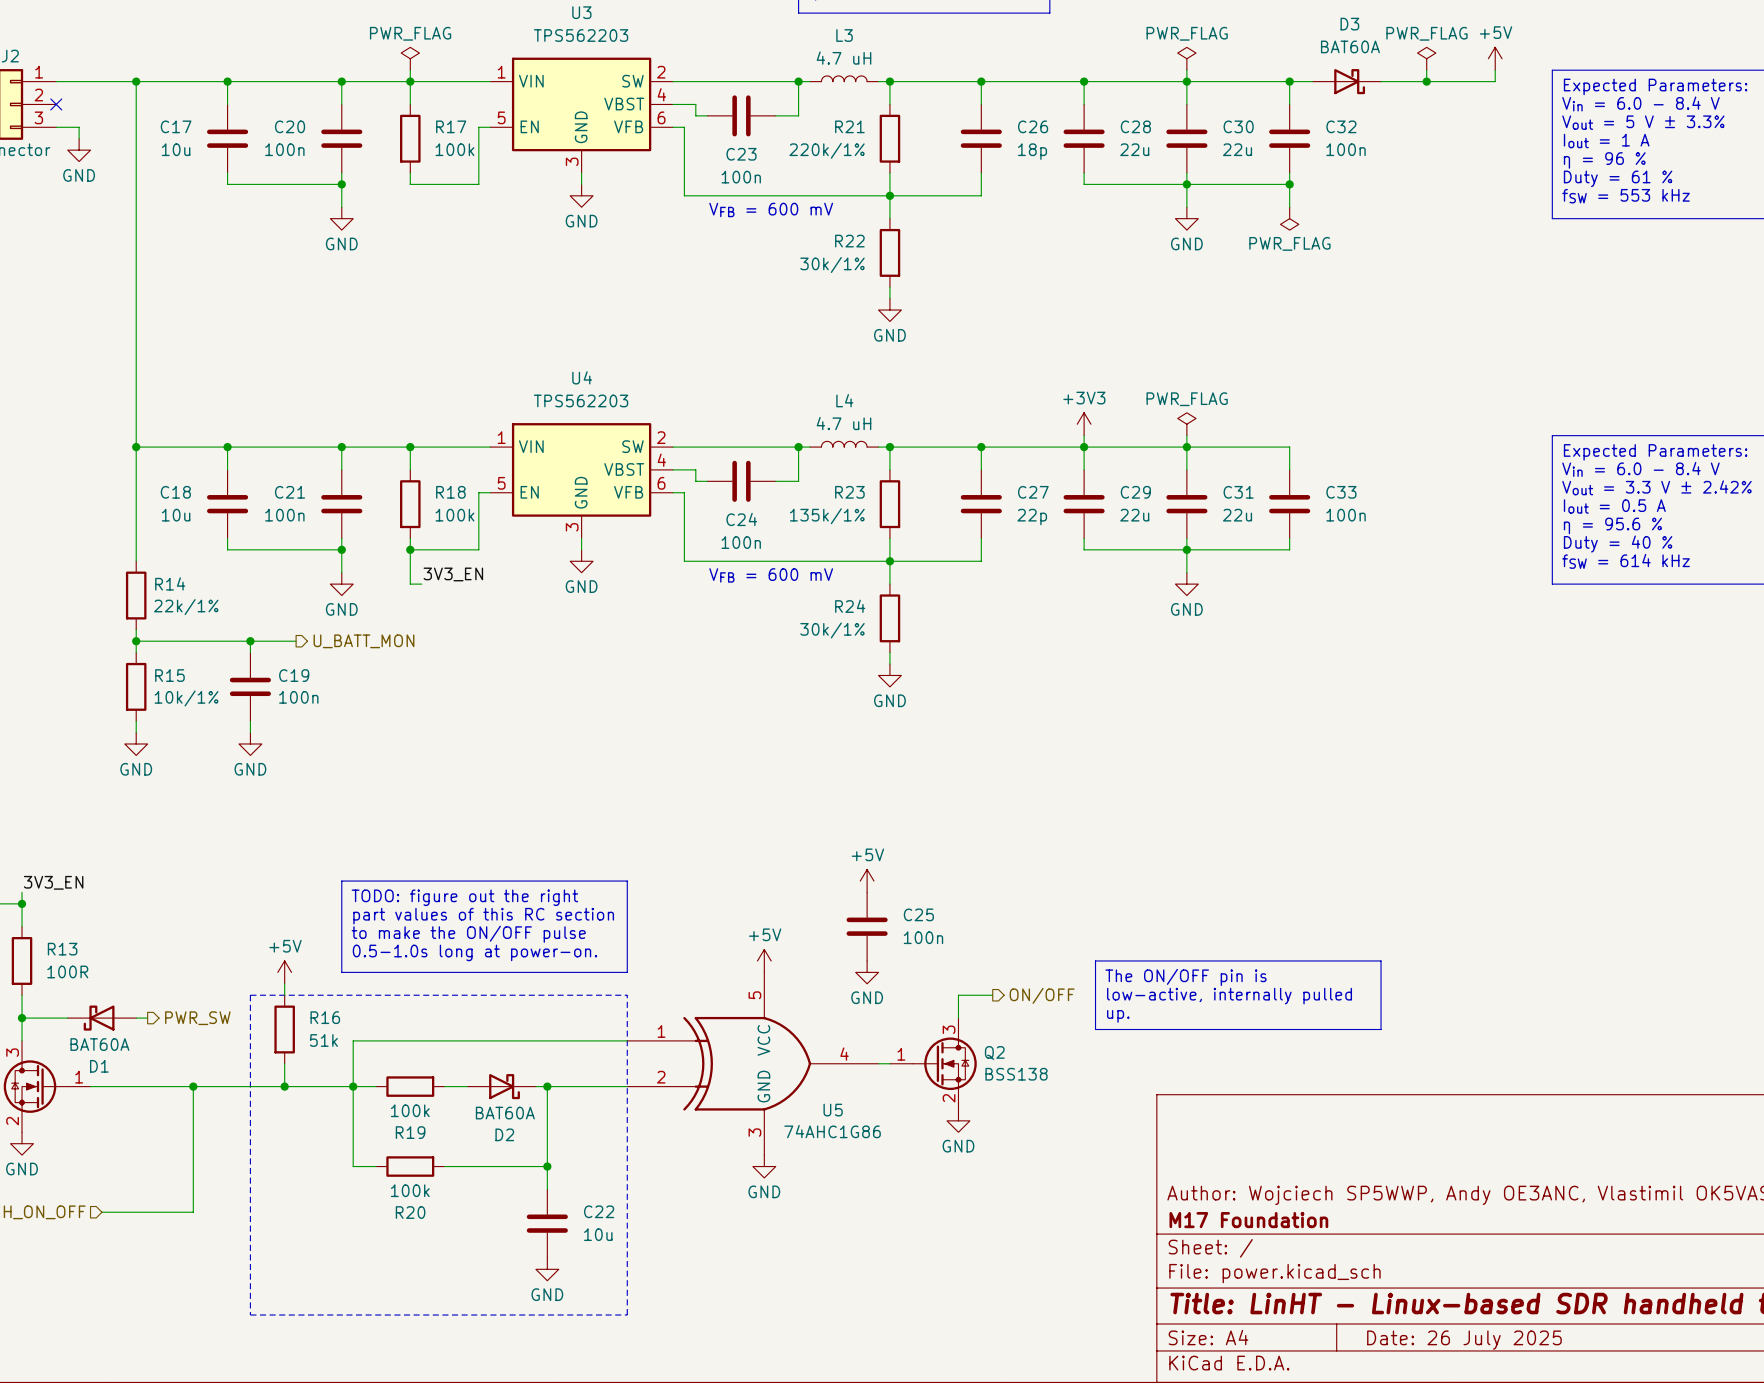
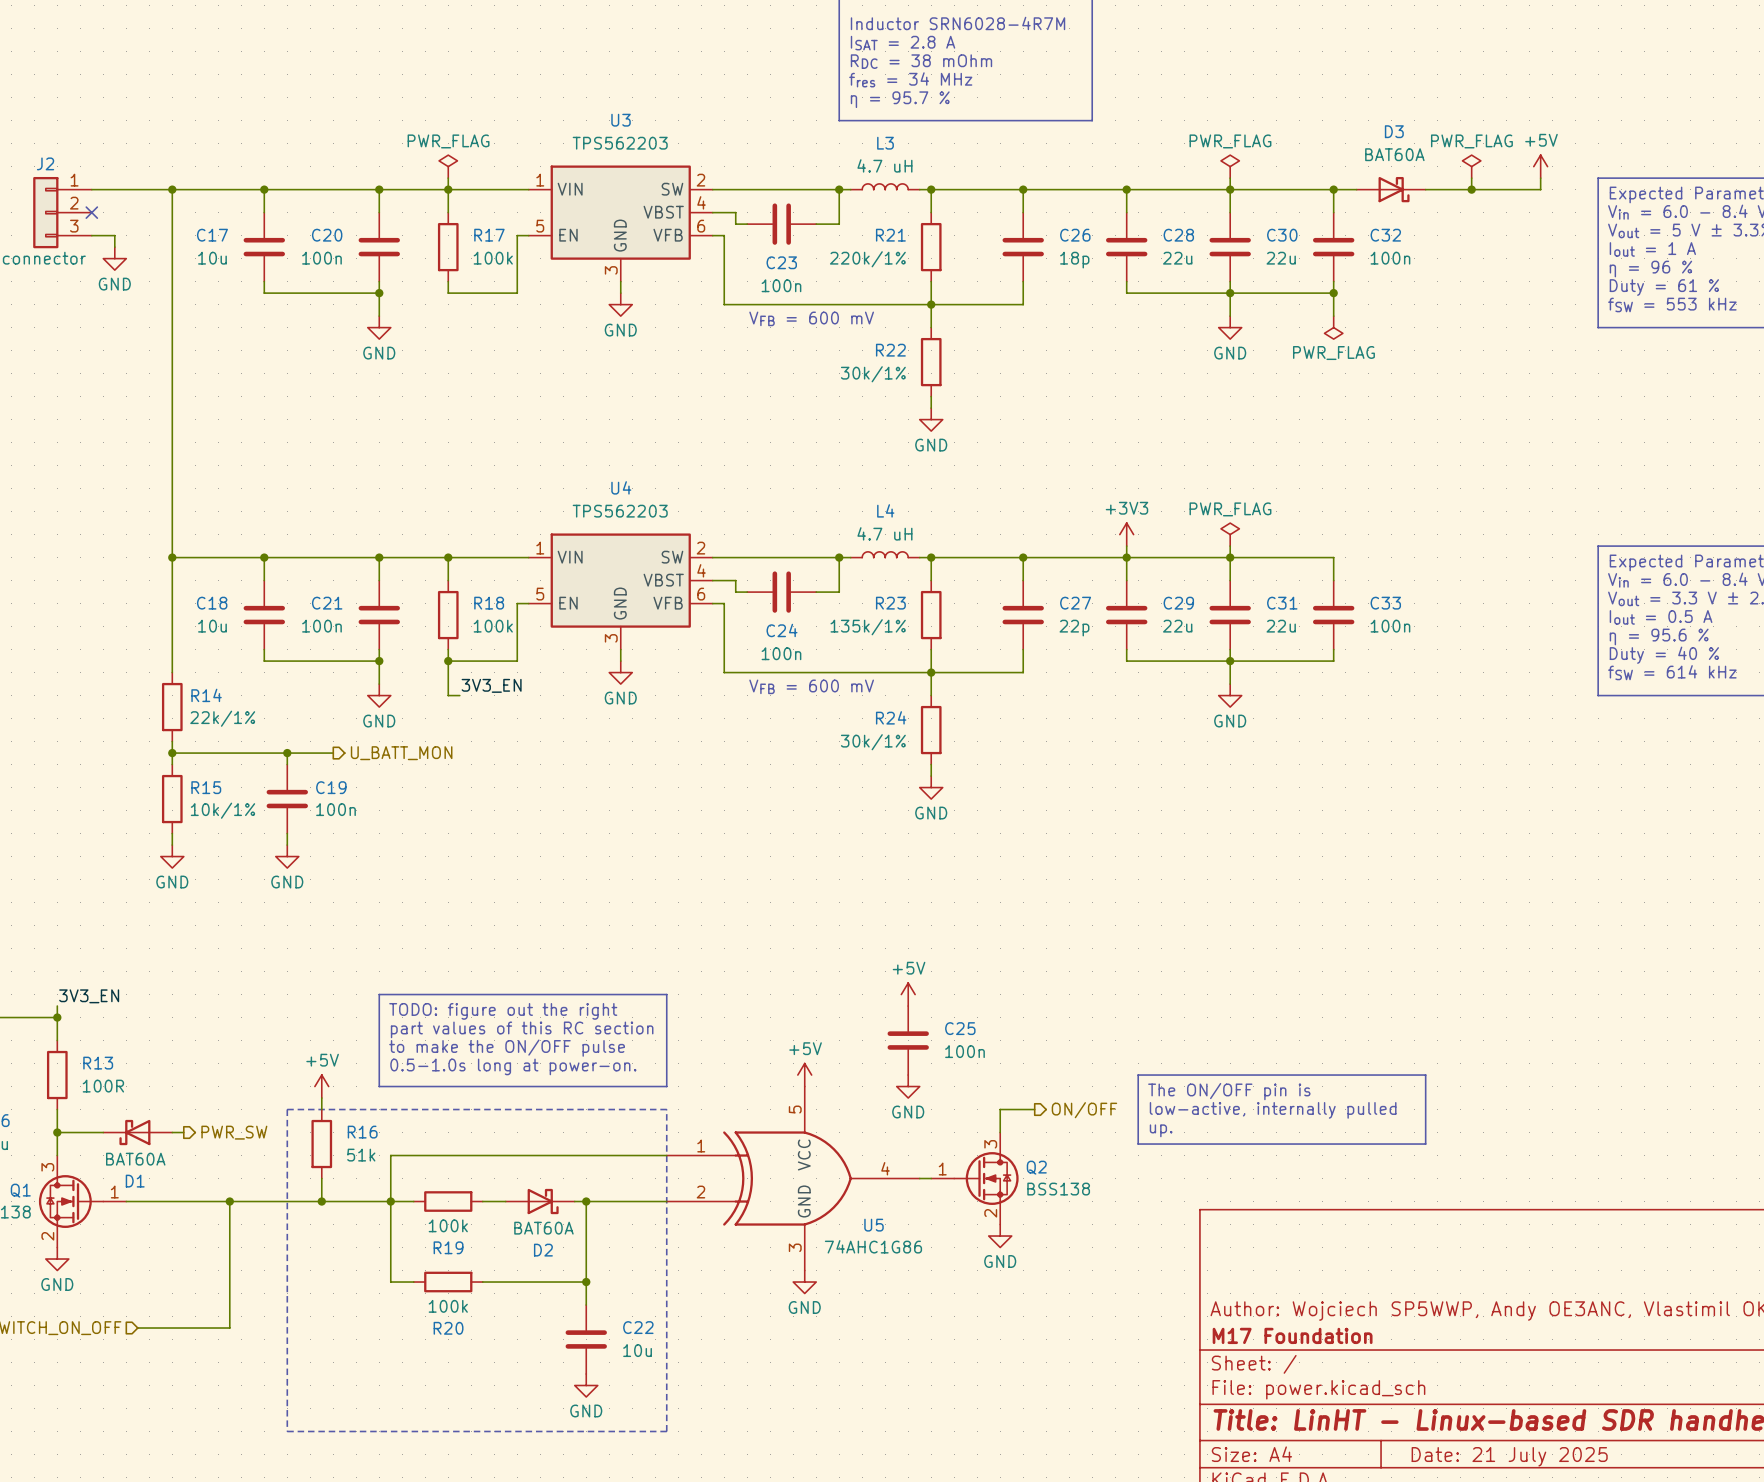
title block: Date: 26 July 2025 (1464, 1340) -> Date: 21 July 2025 (1509, 1456)

